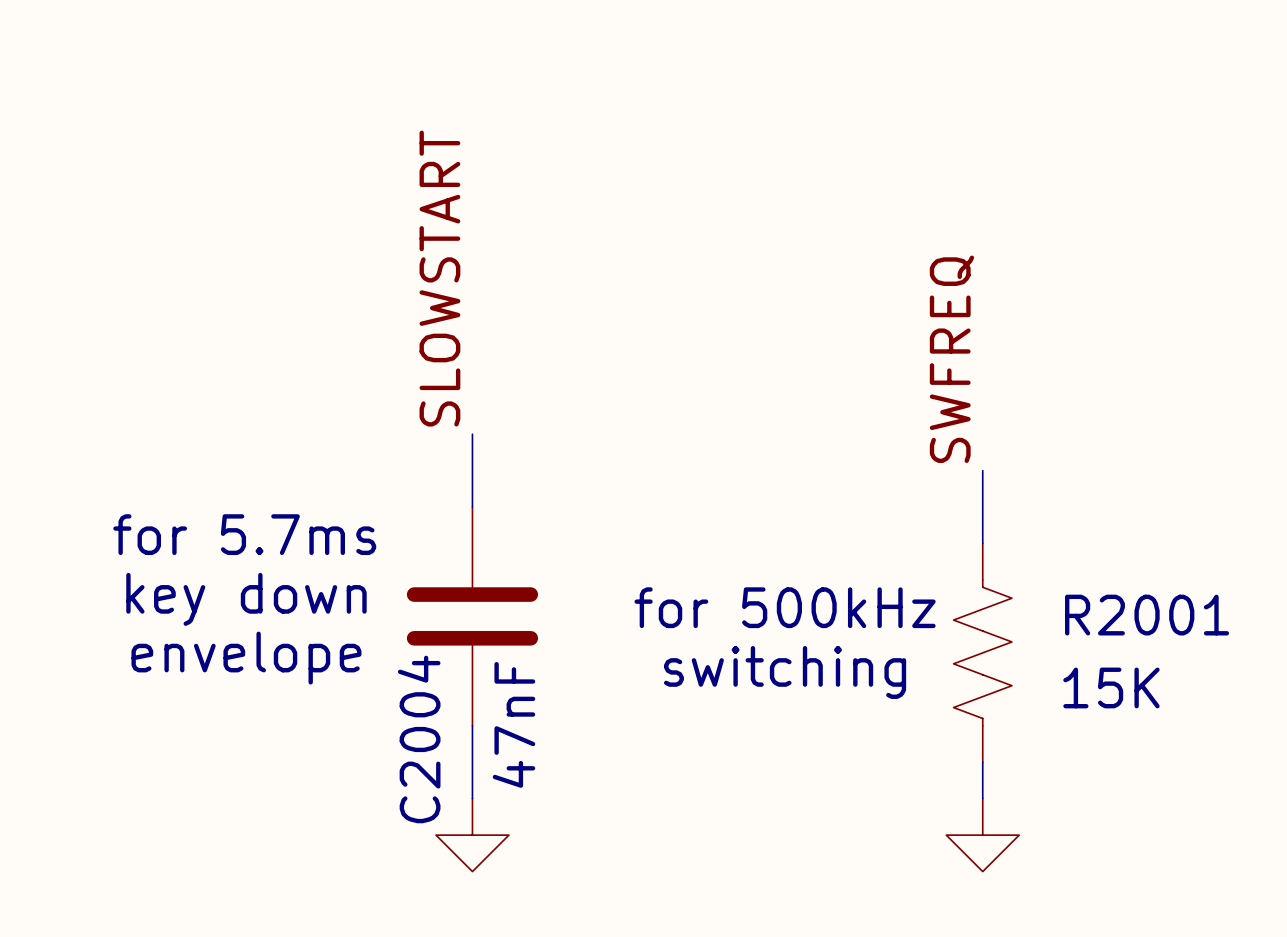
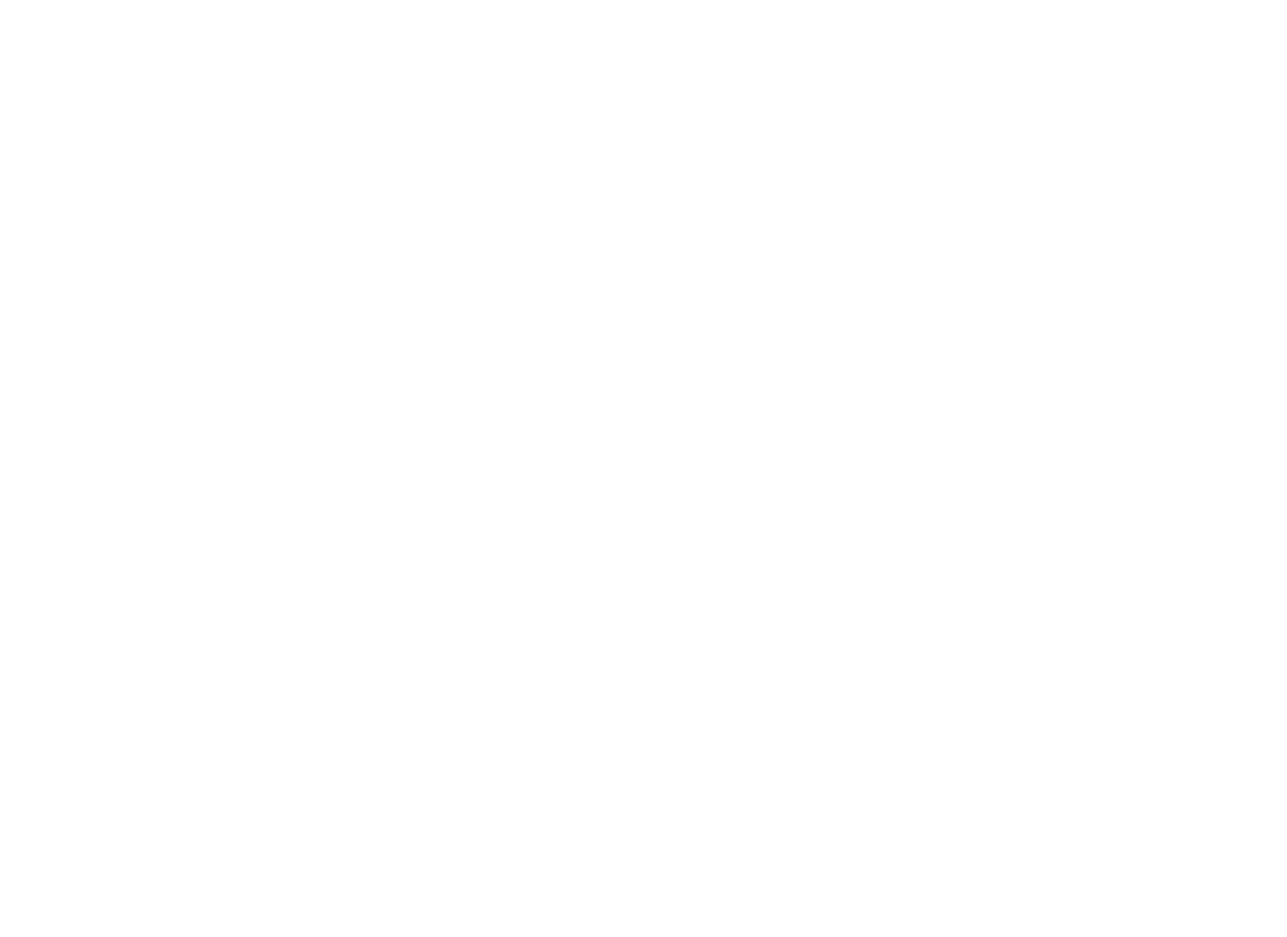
label: SLOWSTART (439, 278) -> none
label: SWFREQ (951, 359) -> none
wire: (472, 434) (472, 507) -> none
wire: (982, 470) (982, 543) -> none
text: for 5.7ms (244, 534) -> none
text: key down (246, 599) -> none
text: for 500kHz (785, 607) -> none
C2004: 47nF (472, 616) -> none
R2001: 15K (982, 652) -> none
text: envelope (246, 658) -> none
text: switching (785, 672) -> none
wire: (472, 725) (472, 798) -> none
wire: (982, 762) (982, 798) -> none
power symbol: (472, 835) -> none
power symbol: (982, 835) -> none

